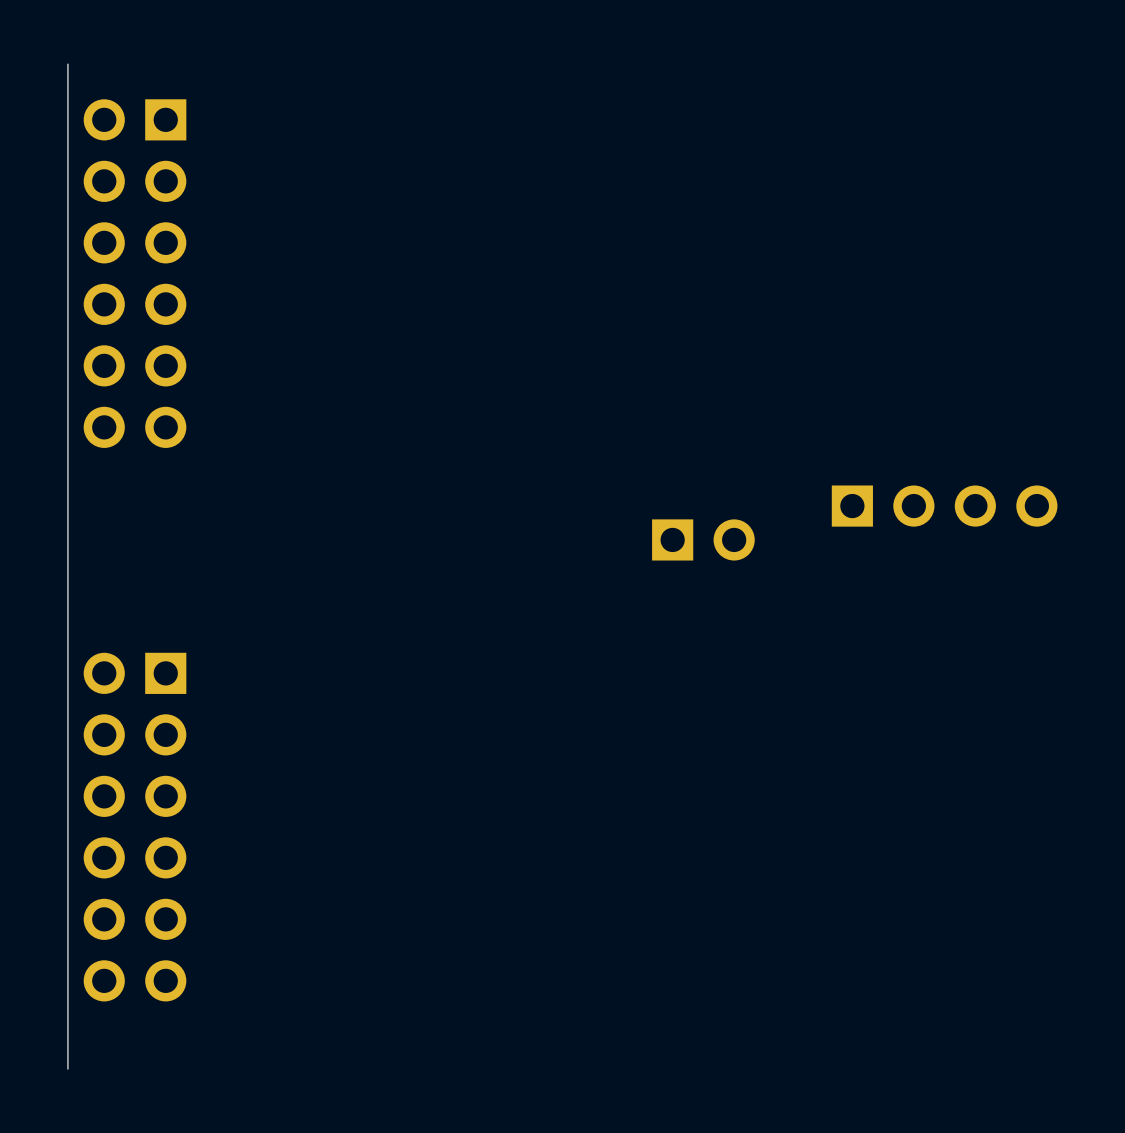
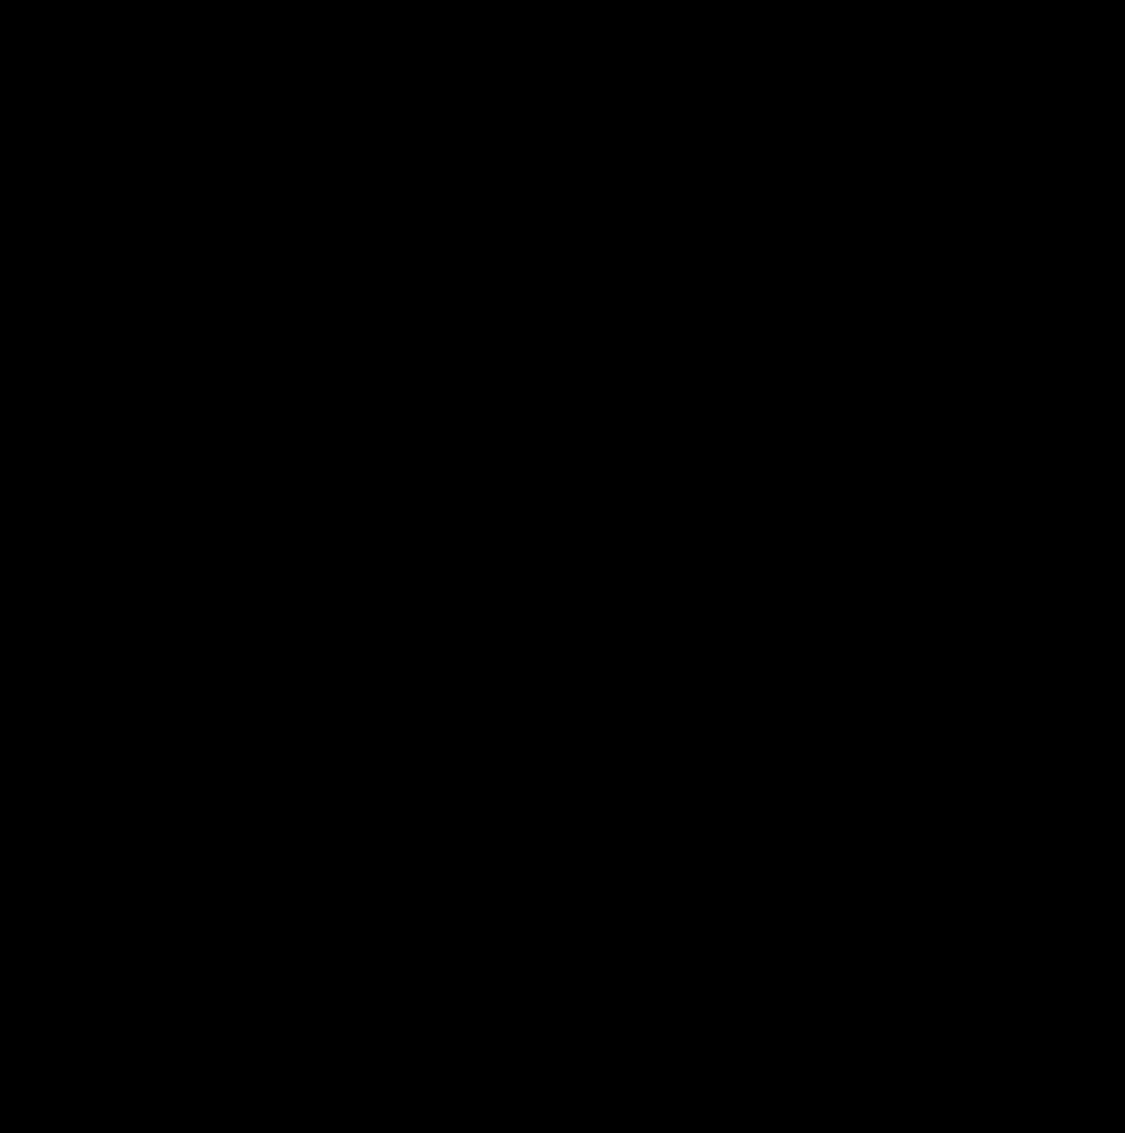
board edge: (67, 64) (67, 1069) -> none
part: (135, 273) -> none
part: (944, 506) -> none
part: (703, 539) -> none
part: (135, 827) -> none

